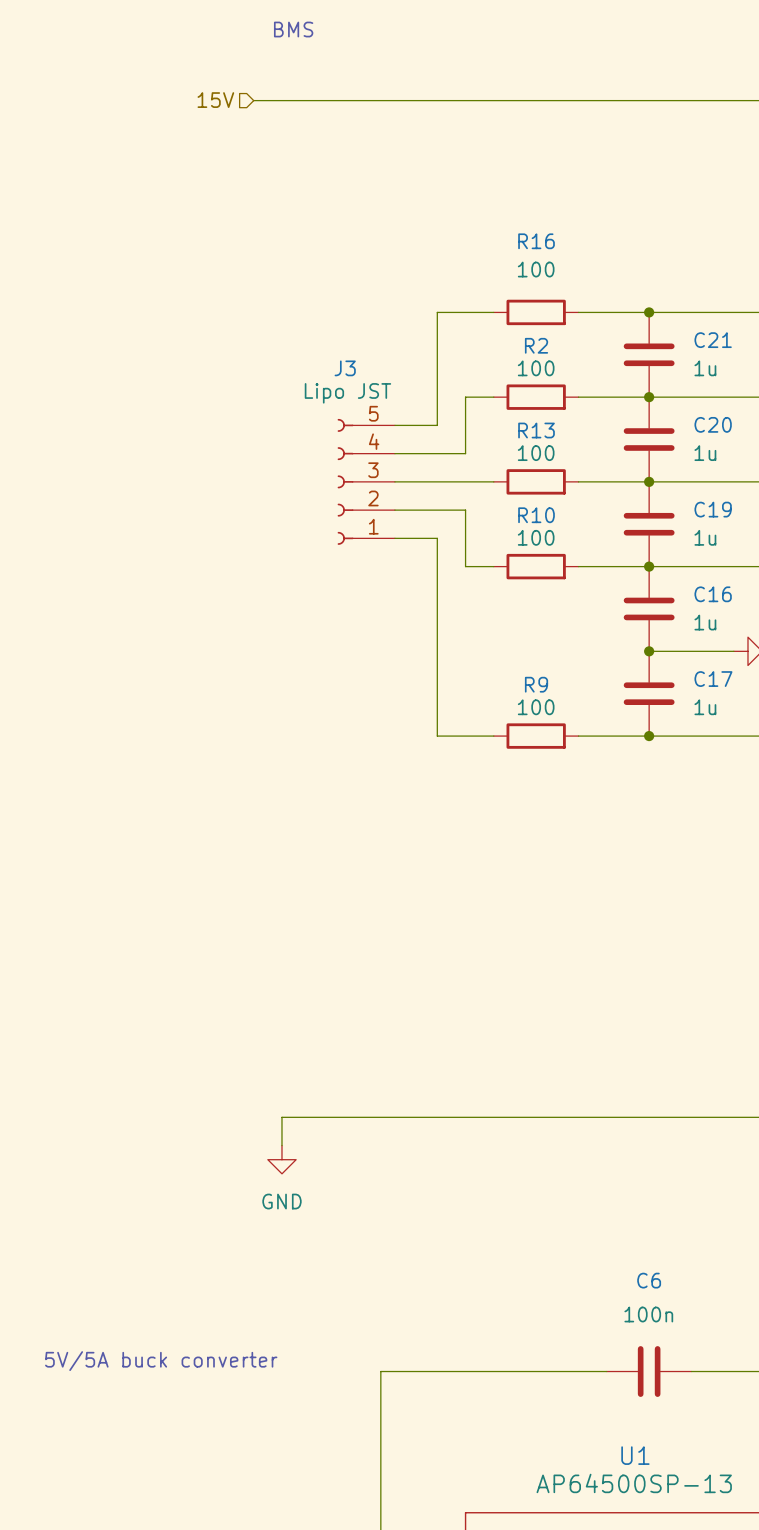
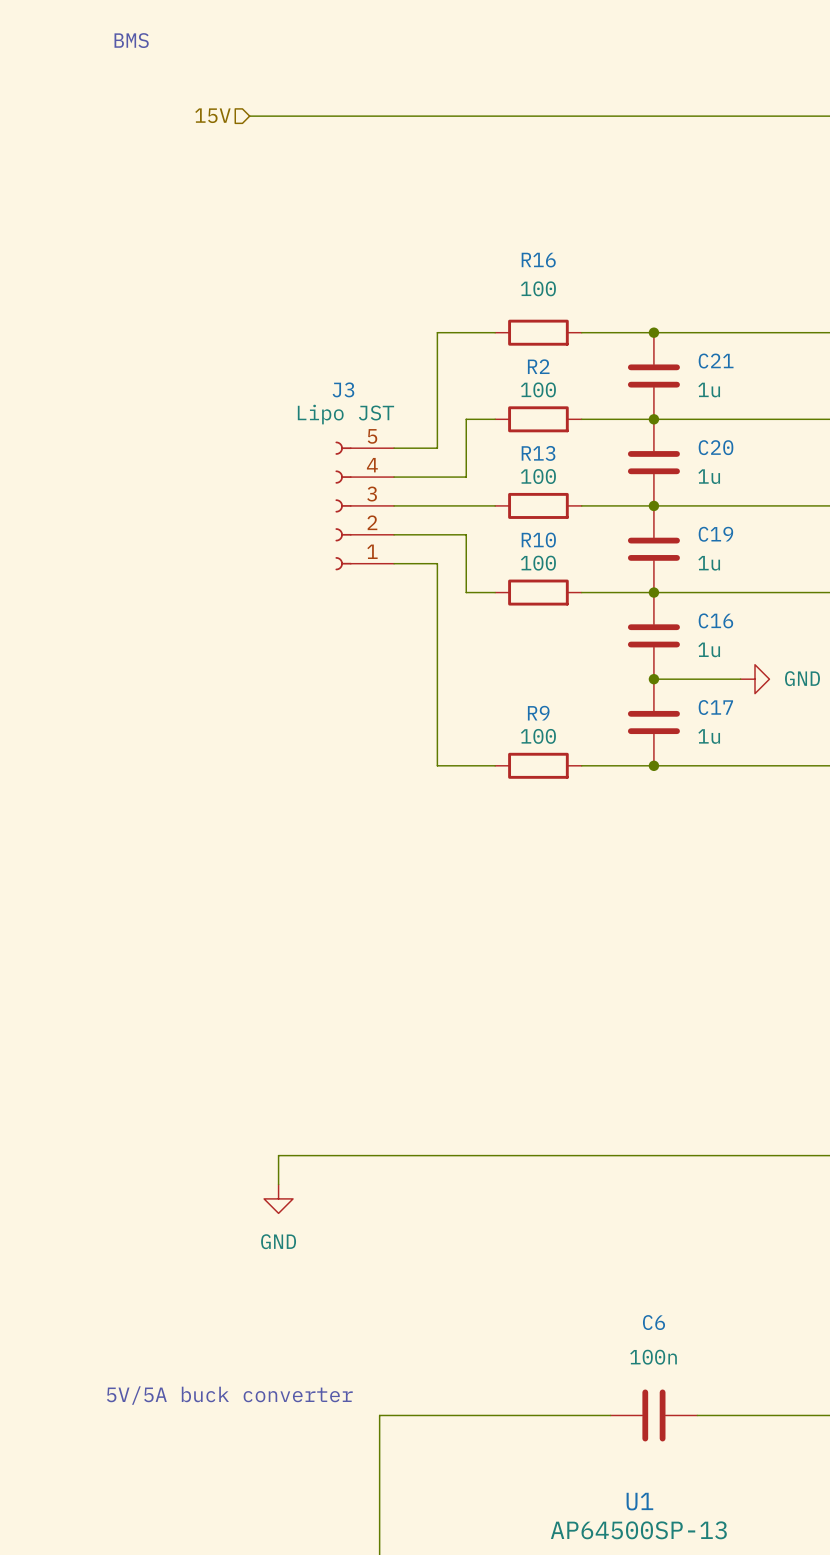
text position: BMS (293, 29) -> BMS (131, 40)
text position: 5V/5A buck converter (161, 1361) -> 5V/5A buck converter (229, 1395)

